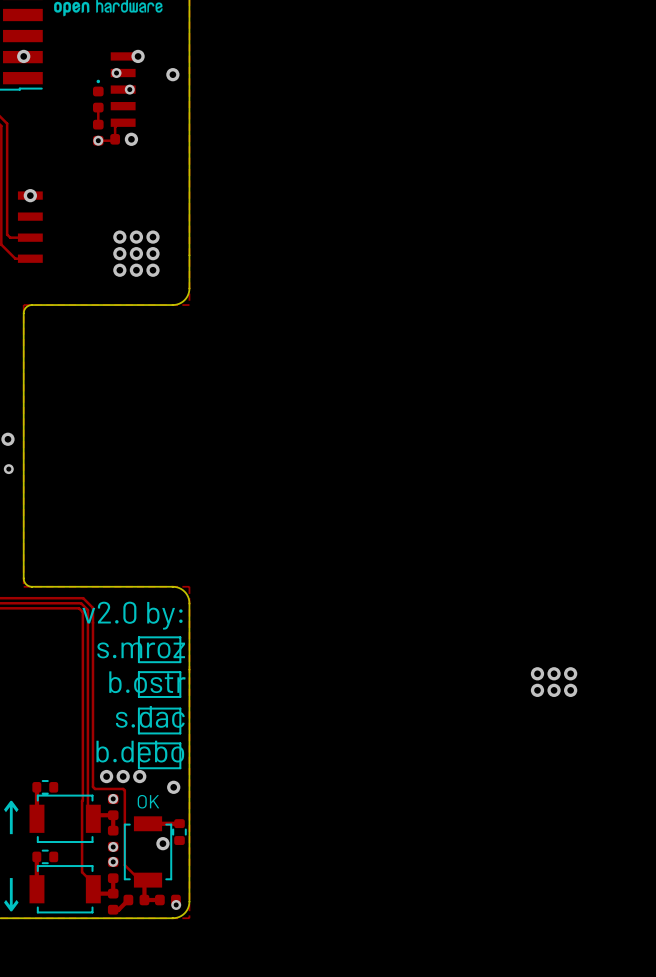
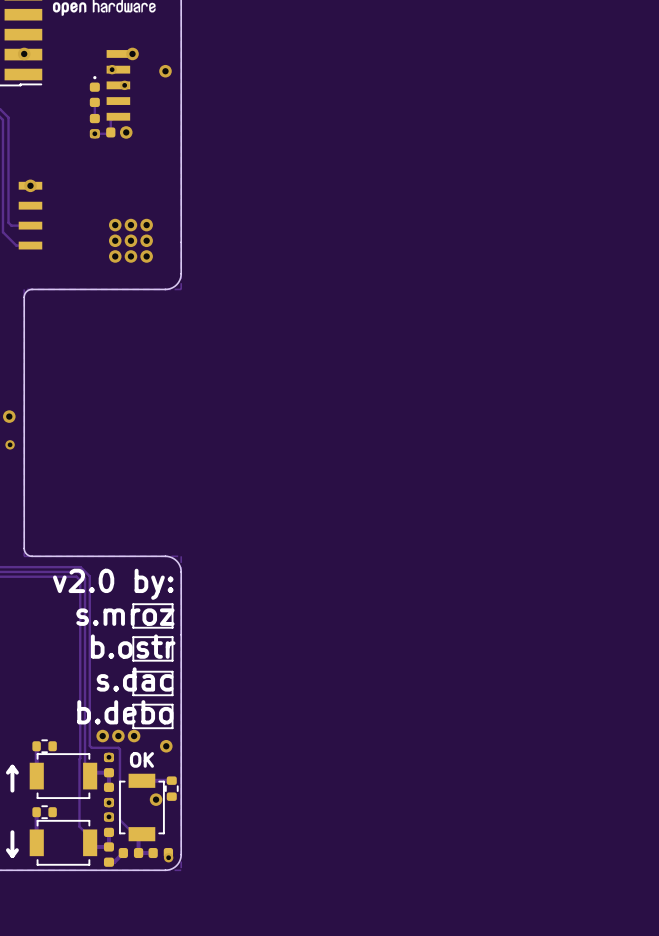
via: (537, 673) -> none
via: (554, 673) -> none
via: (570, 673) -> none
via: (537, 690) -> none
via: (554, 690) -> none
via: (570, 690) -> none

